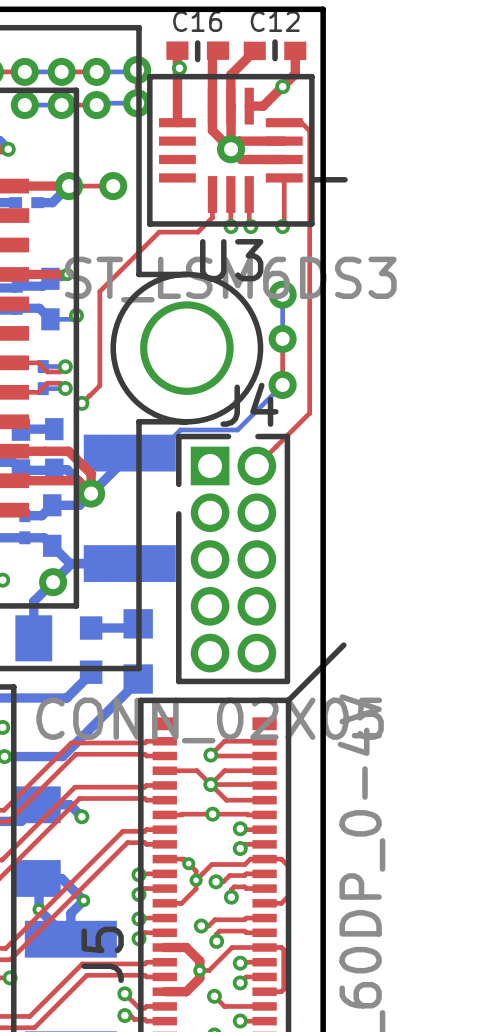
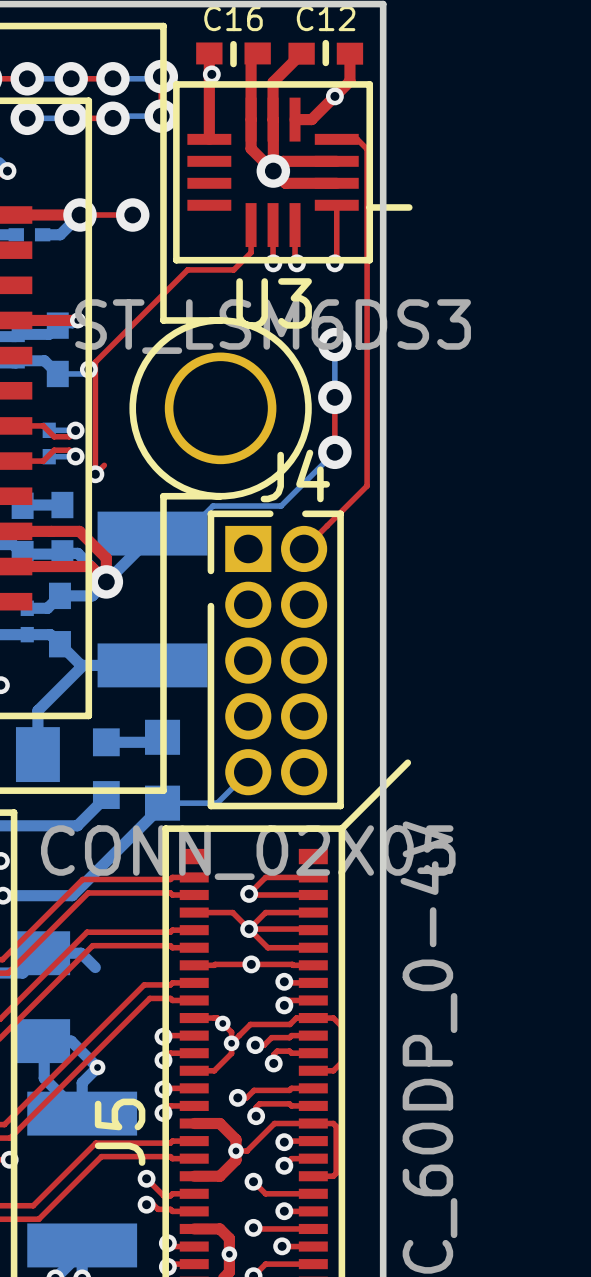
top track: (99, 291) (99, 385) (89, 395) -> (116, 340) (95, 362) (95, 474)
via: (53, 582) -> none
bottom track: none -> (248, 772) (217, 803) (162, 803) (162, 805)
via: (81, 816) -> none
via: (39, 909) -> none

